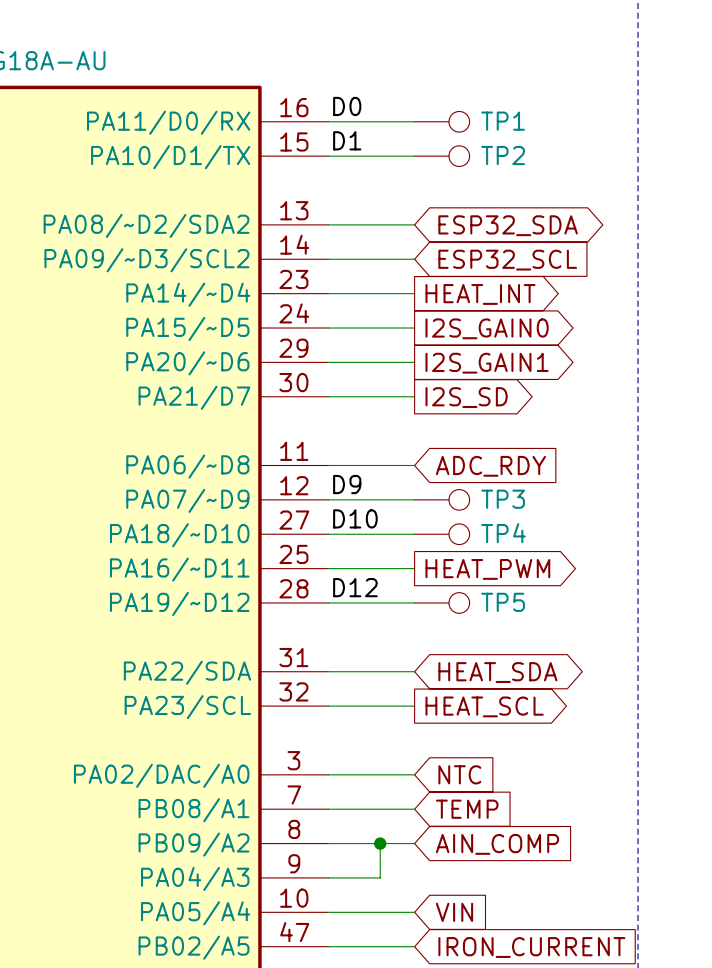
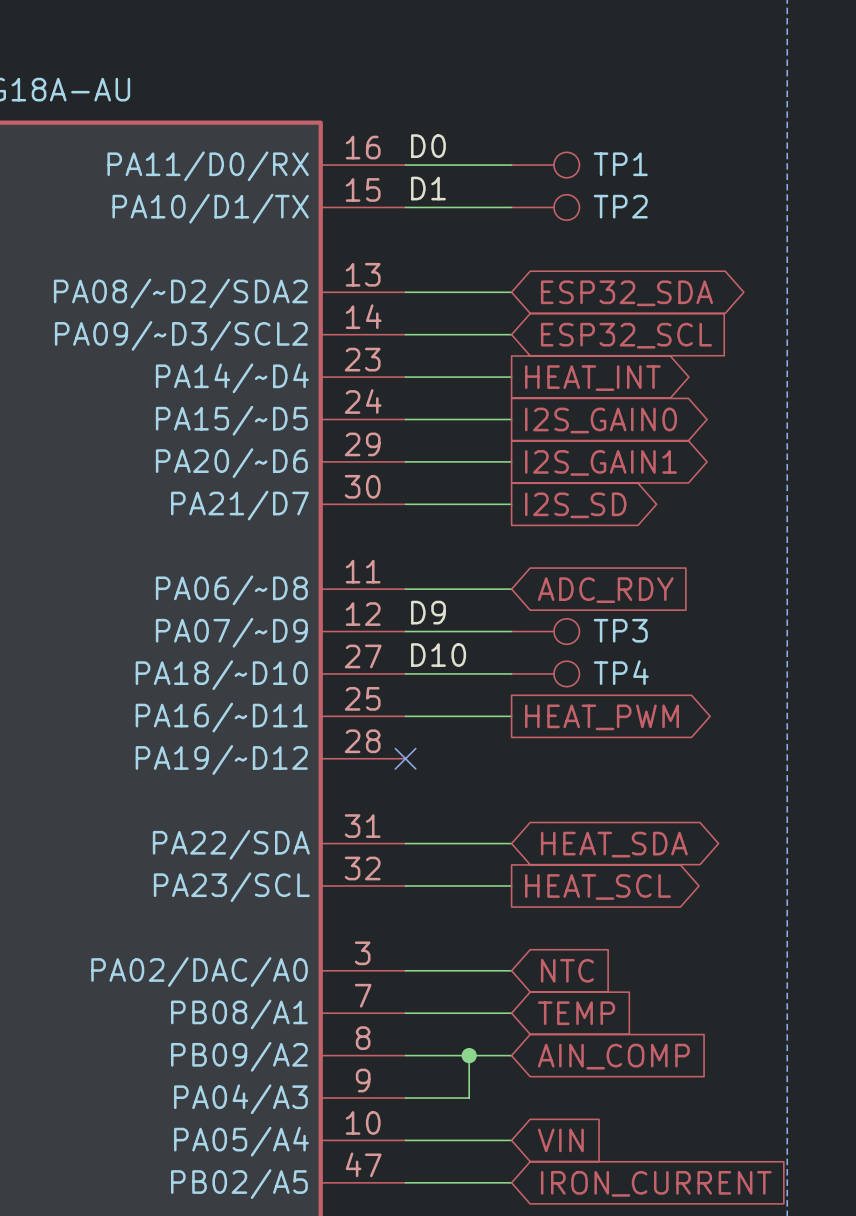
label: D12 (355, 587) -> none
wire: (328, 602) (414, 602) -> none
no-connect mark: none -> (405, 758)
TP5: (442, 602) -> none

